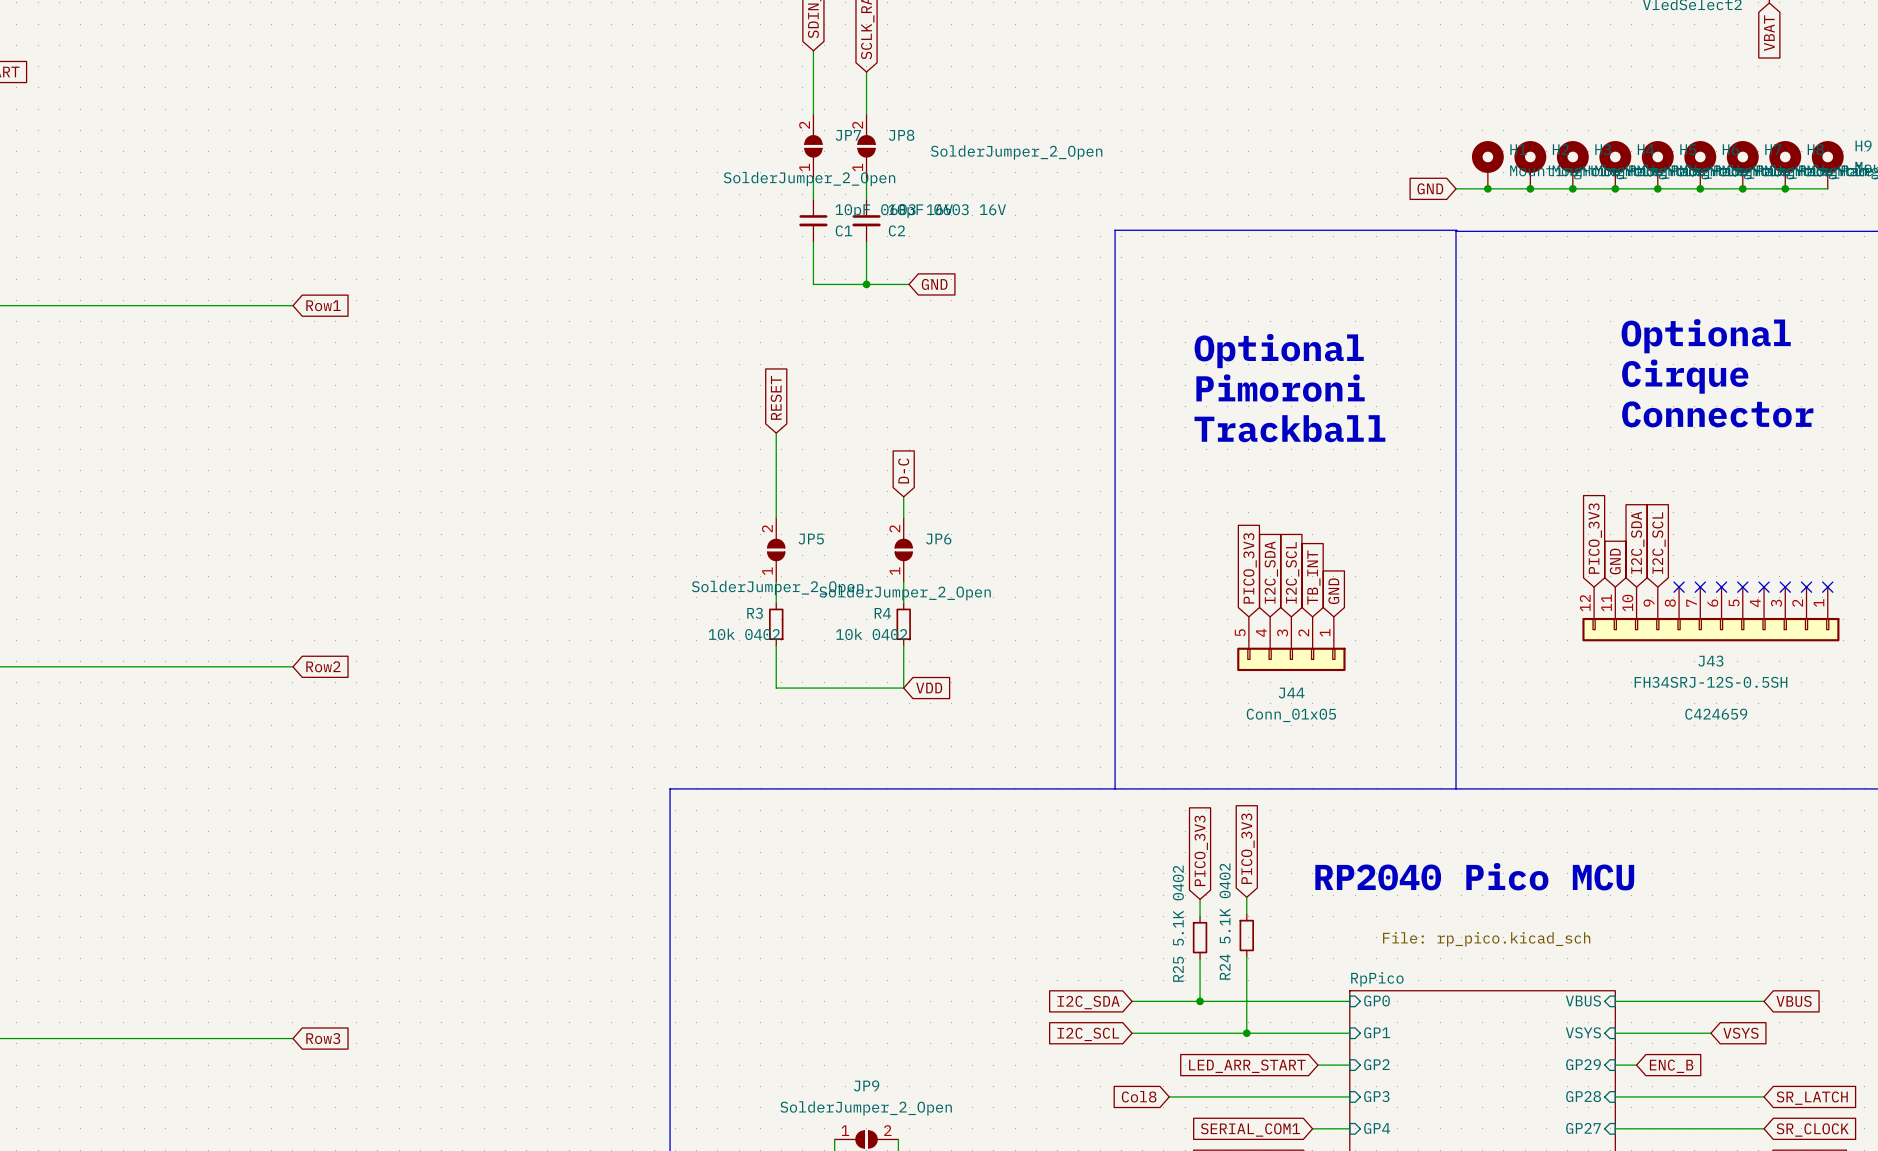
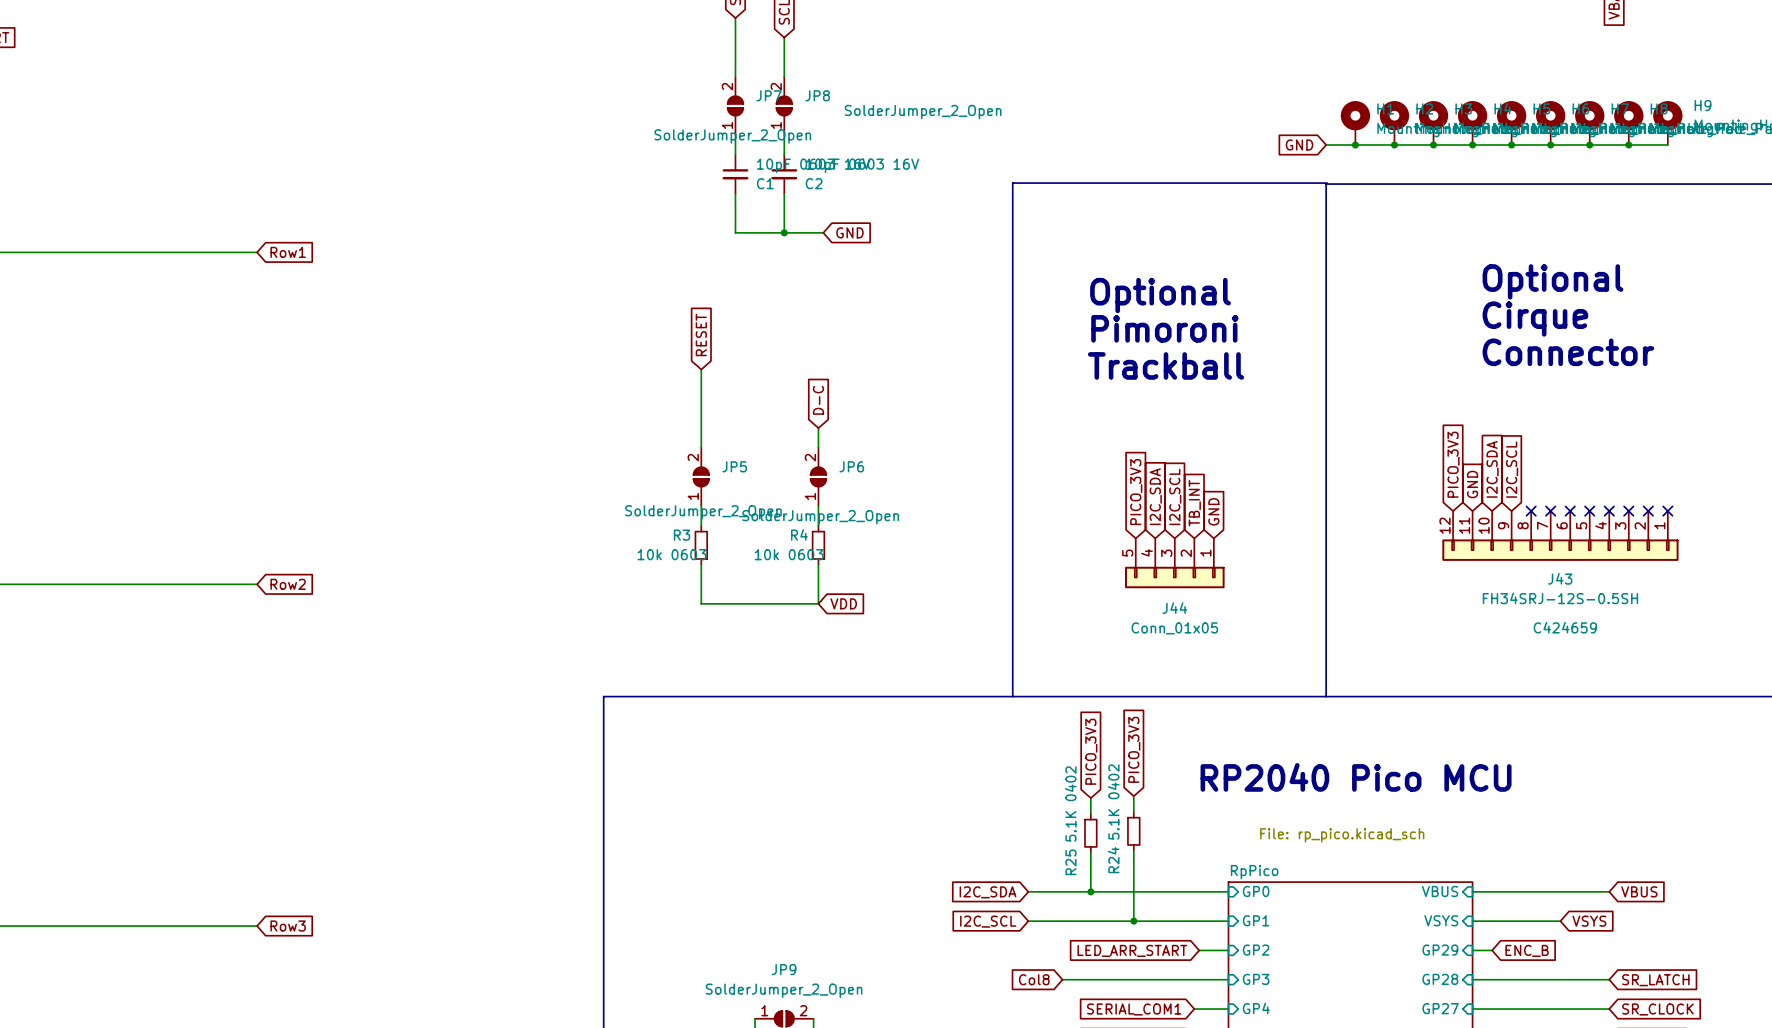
R3 value: 10k 0402 (744, 634) -> 10k 0603 (672, 554)
R4 value: 10k 0402 (871, 634) -> 10k 0603 (789, 554)

